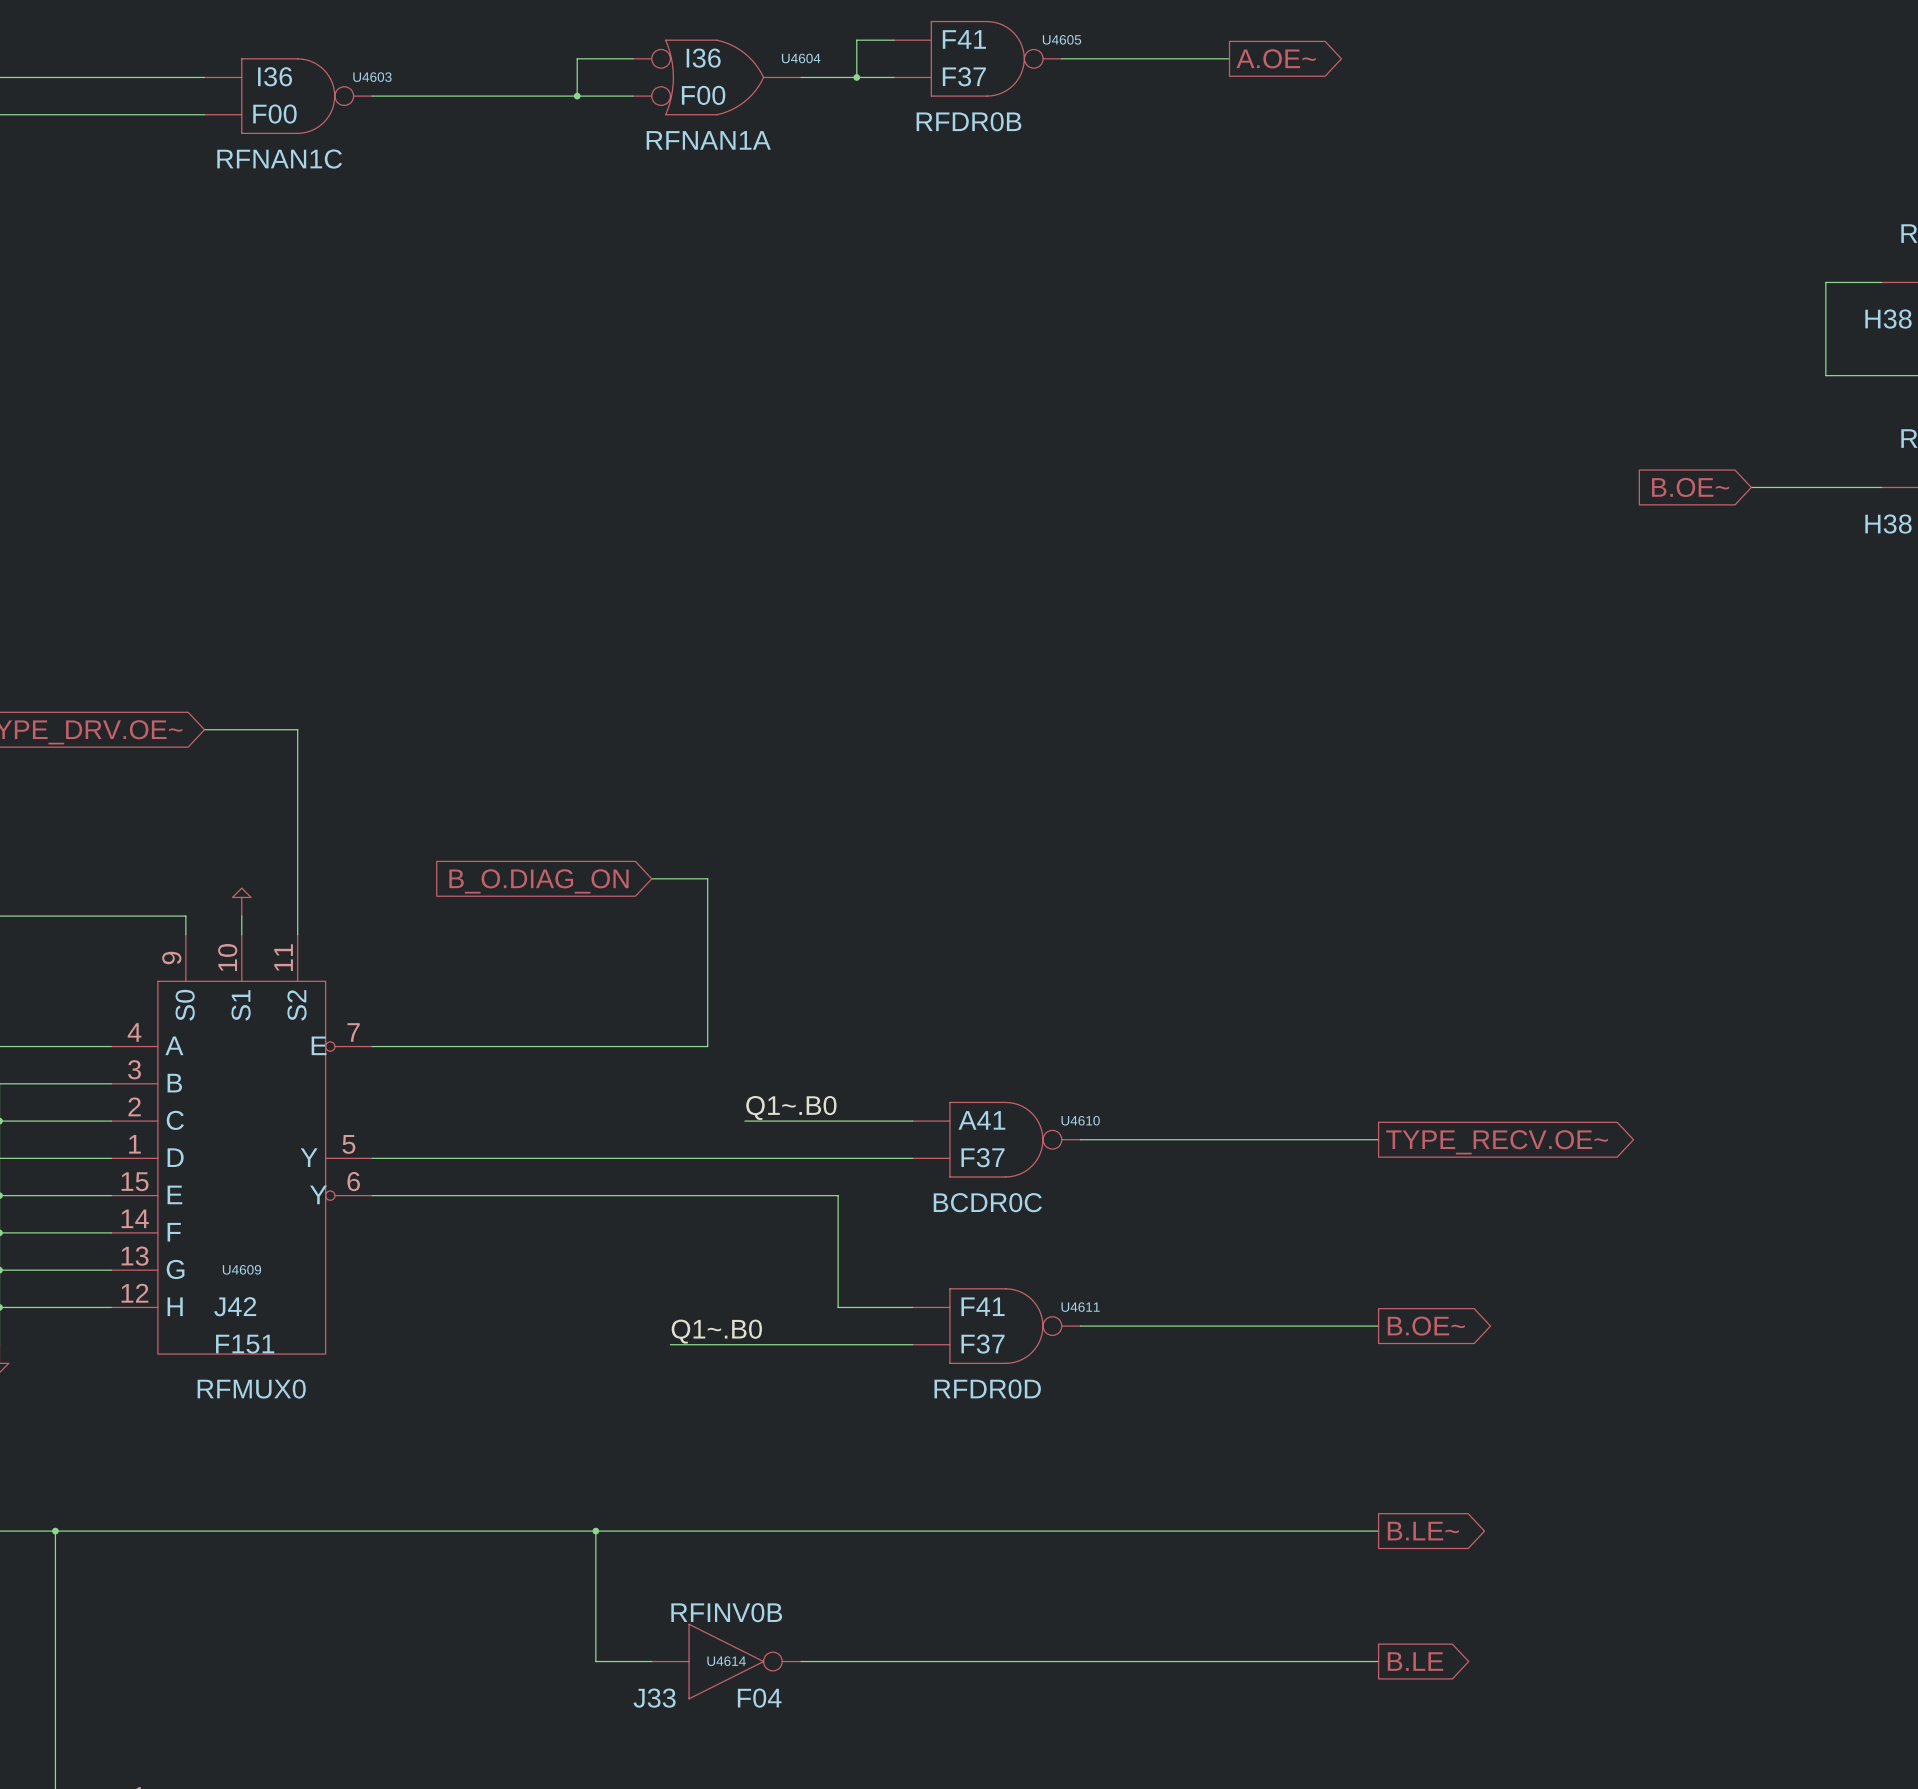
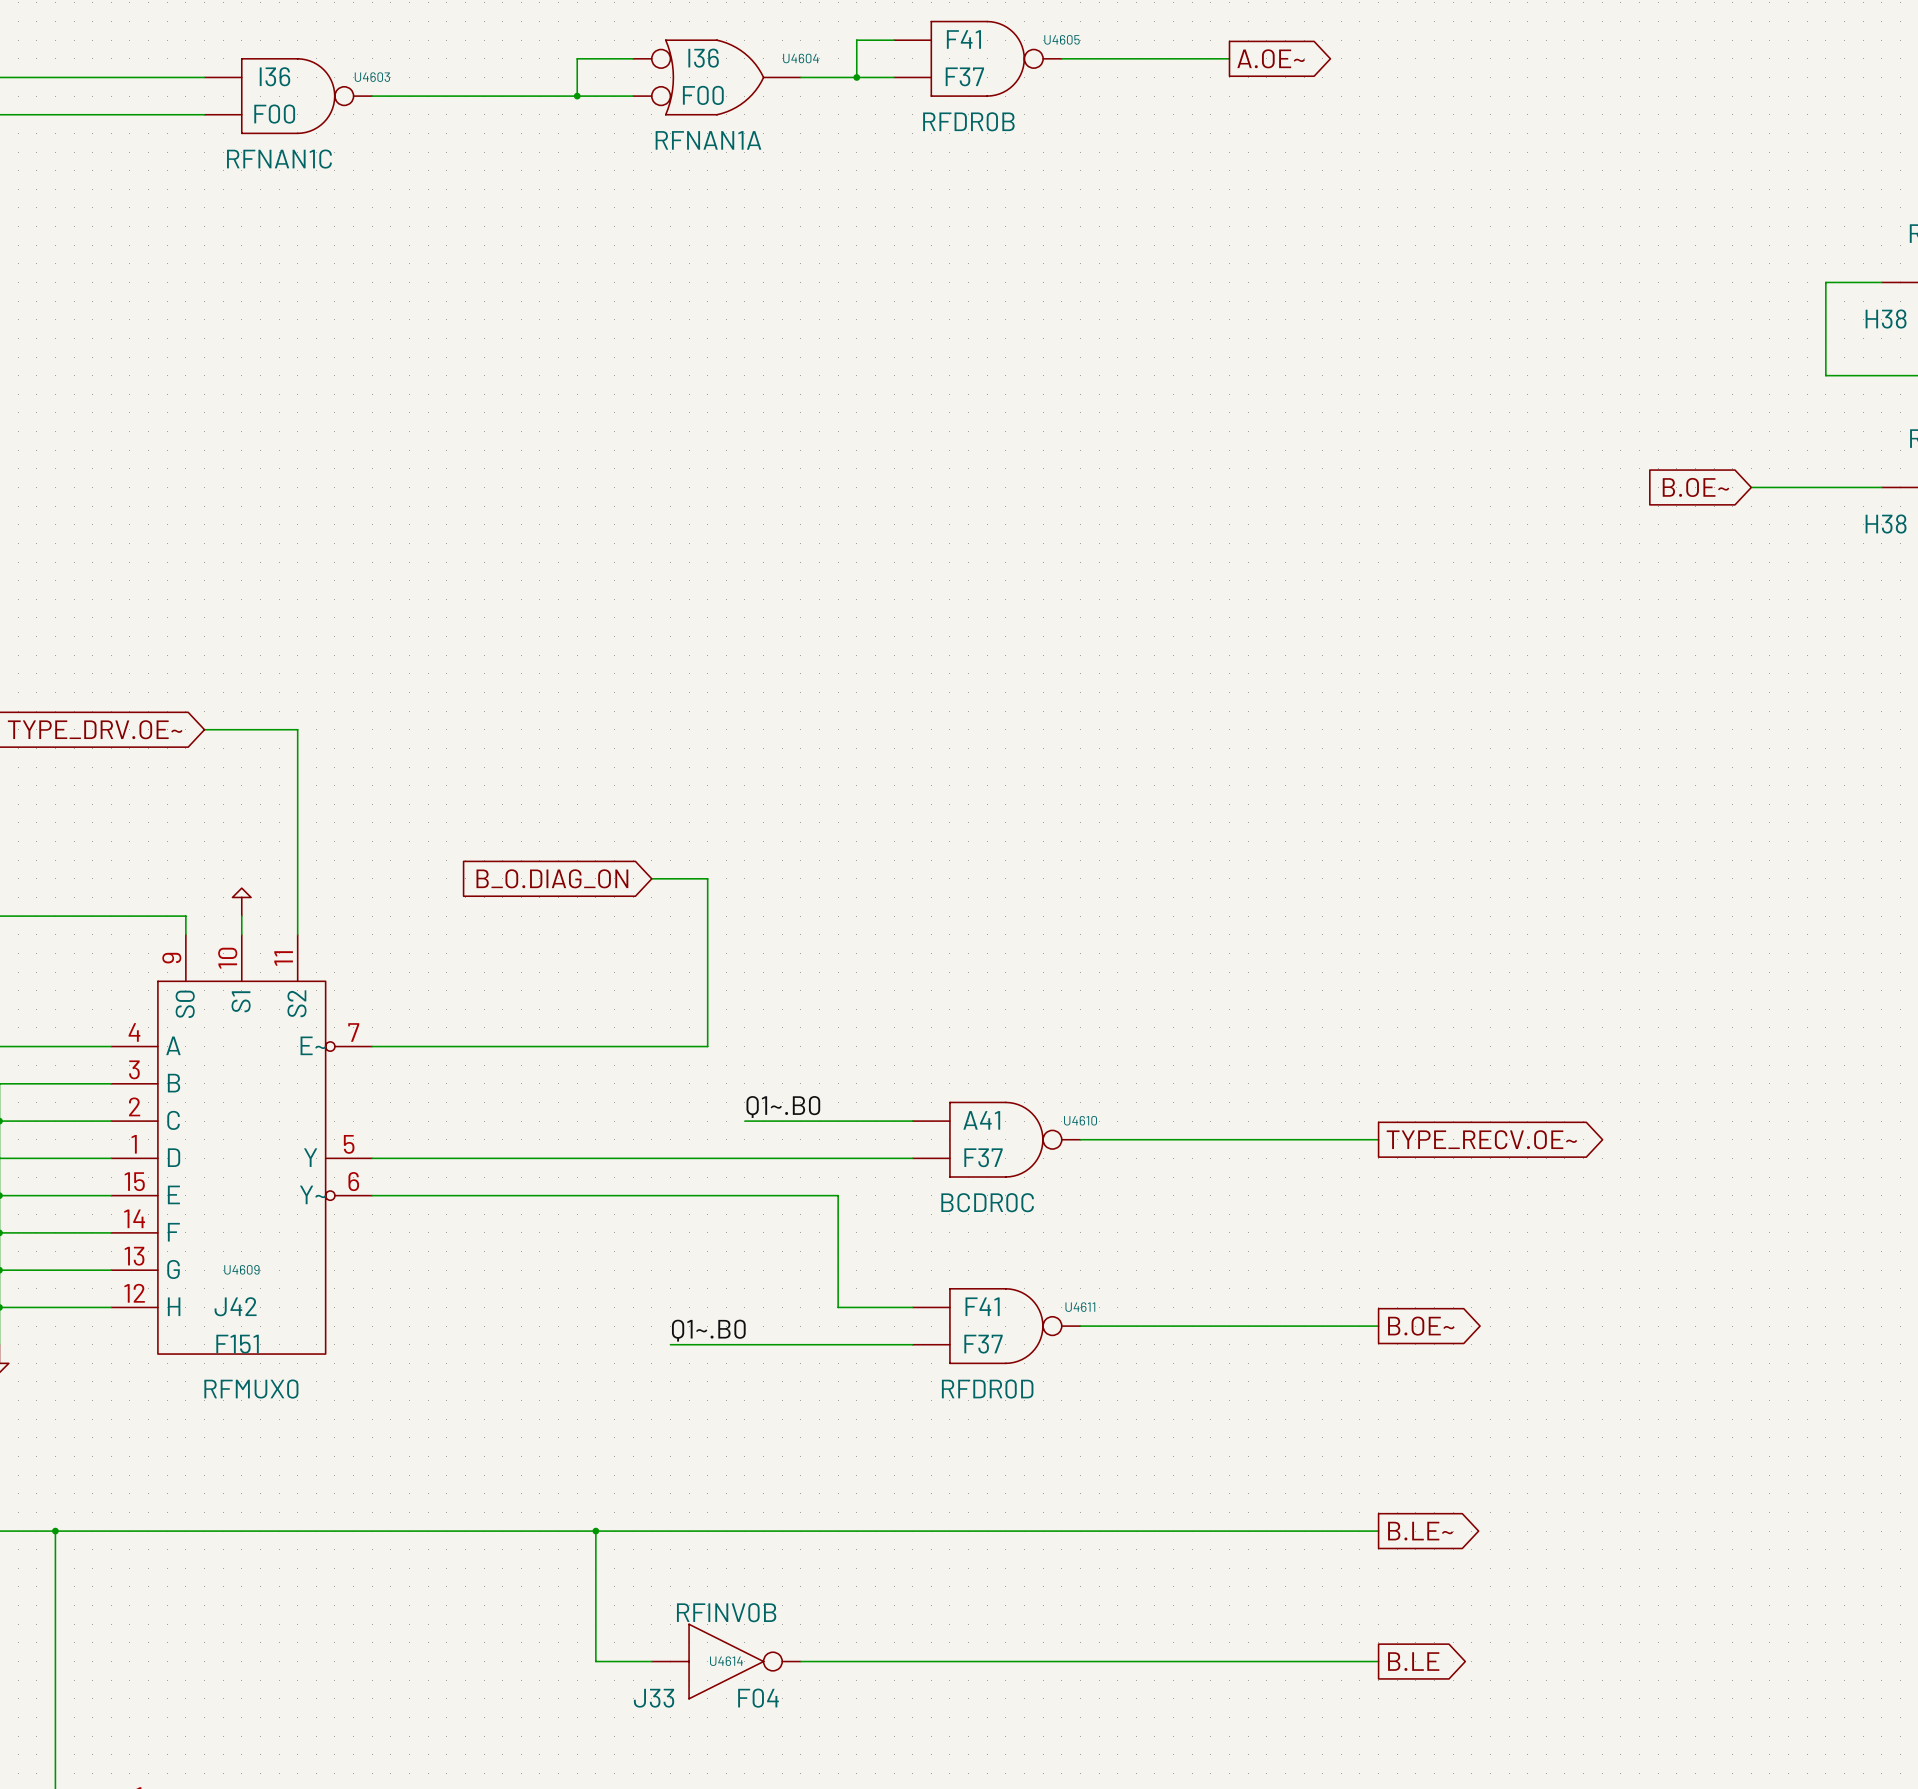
U4609 pin name: E (319, 1045) -> E~ (313, 1045)
U4609 pin name: Y (318, 1194) -> Y~ (313, 1194)

